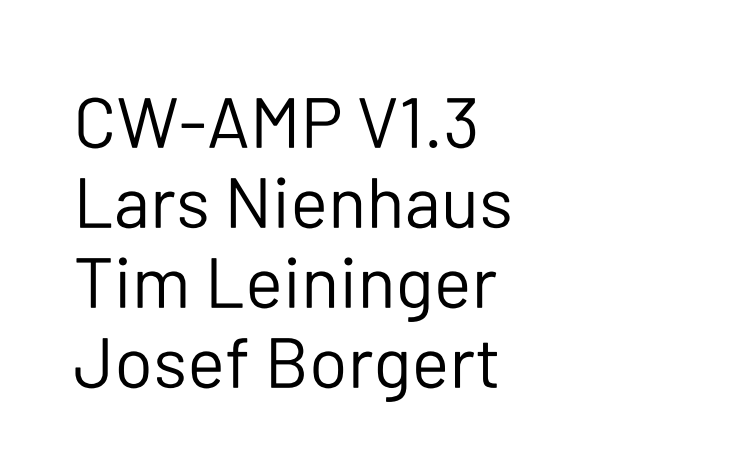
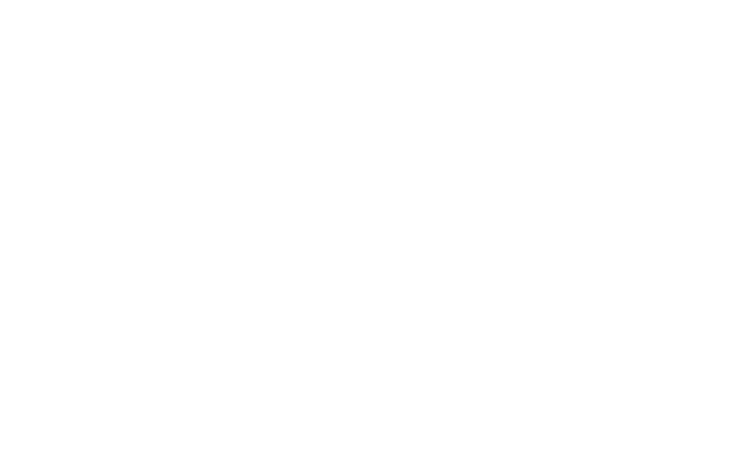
text: CW-AMP V1.3 (276, 123) -> none
text: Lars Nienhaus (294, 202) -> none
text: Tim Leininger (286, 289) -> none
text: Josef Borgert (286, 370) -> none

